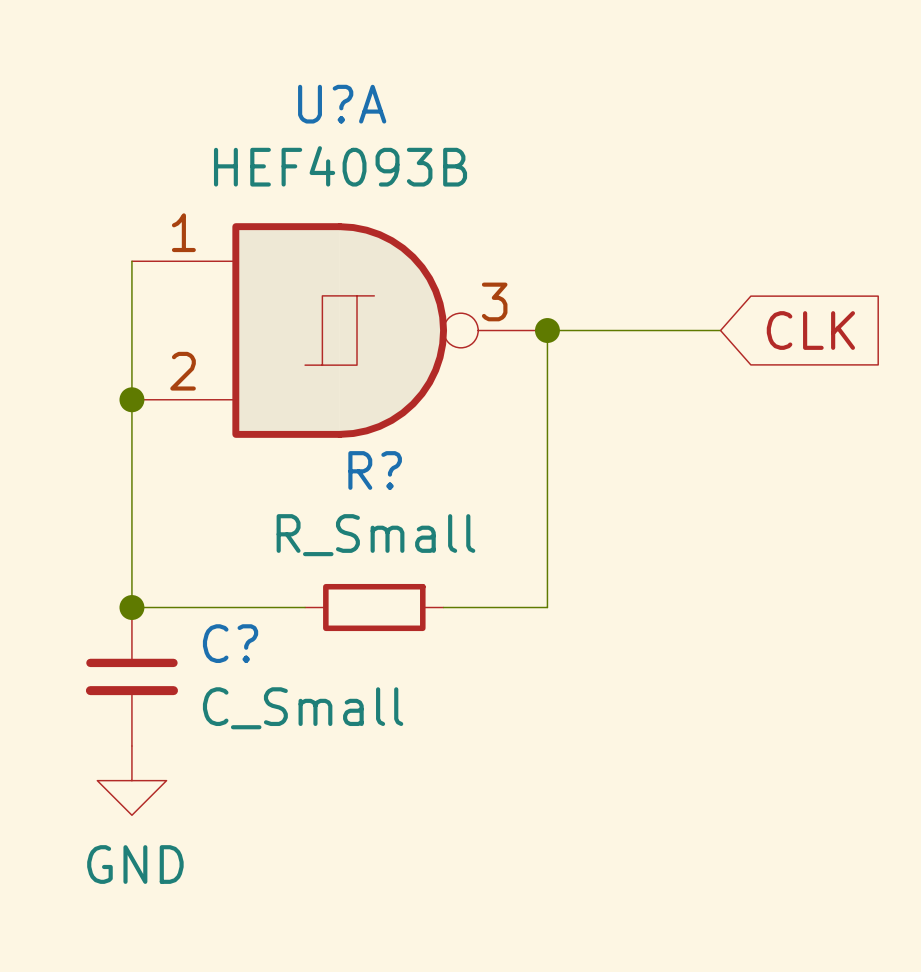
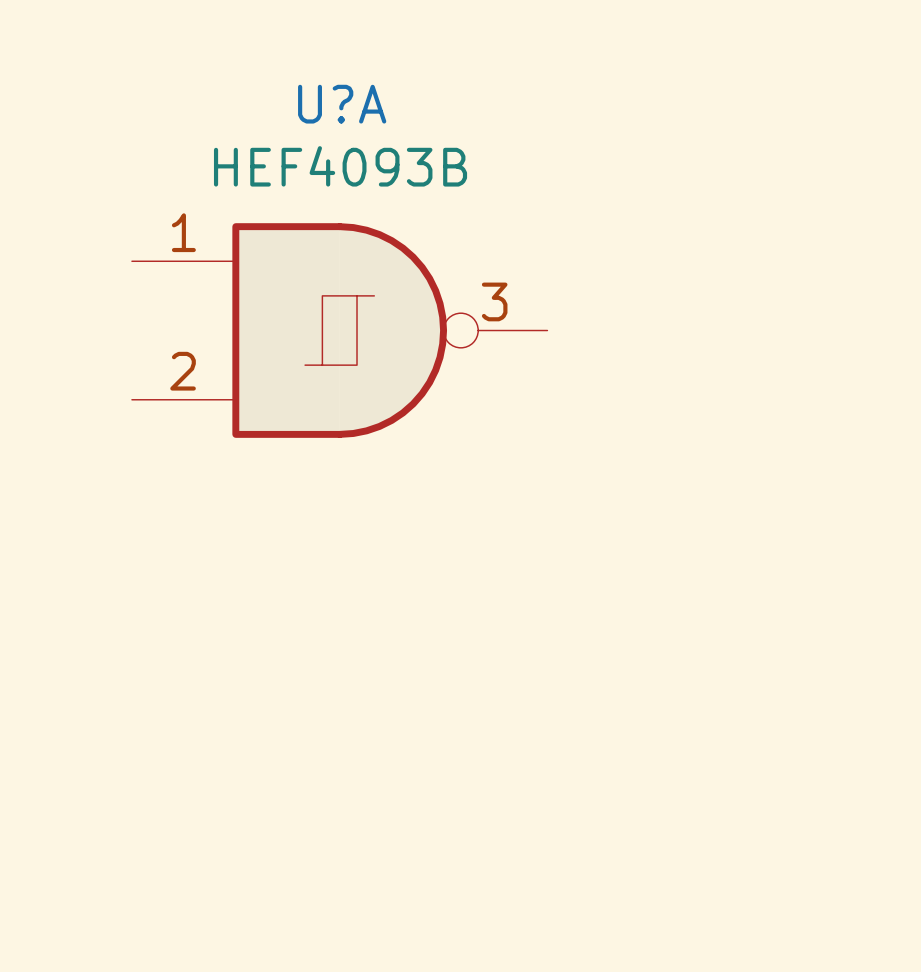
wire: (131, 261) (131, 607) (305, 607) -> none
junction: (547, 330) -> none
wire: (720, 330) (547, 330) (547, 607) (443, 607) -> none
global label: CLK (810, 330) -> none
junction: (131, 399) -> none
junction: (131, 607) -> none
R?: R_Small (374, 607) -> none
C?: C_Small (131, 676) -> none
power symbol: GND (131, 780) -> none

